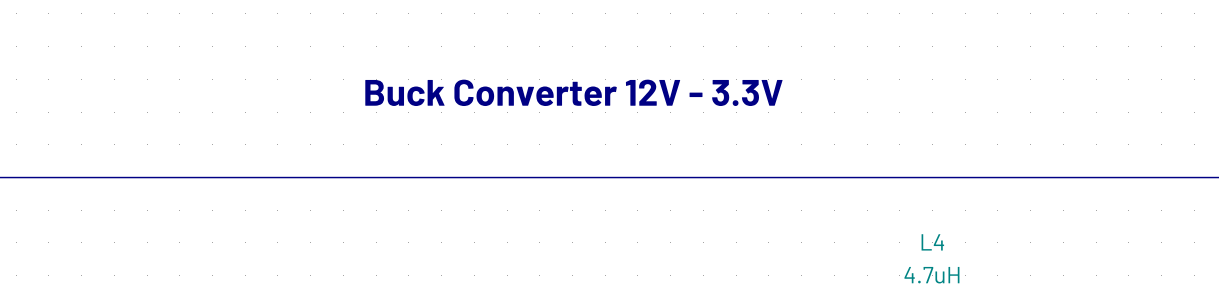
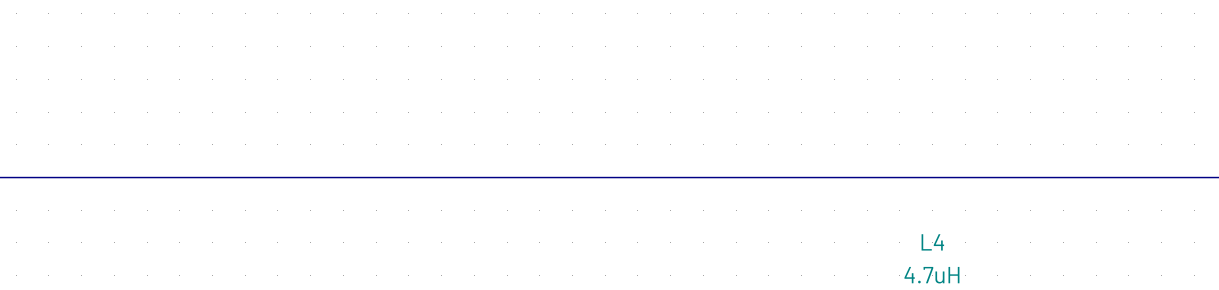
text: Buck Converter 12V - 3.3V (573, 92) -> none

